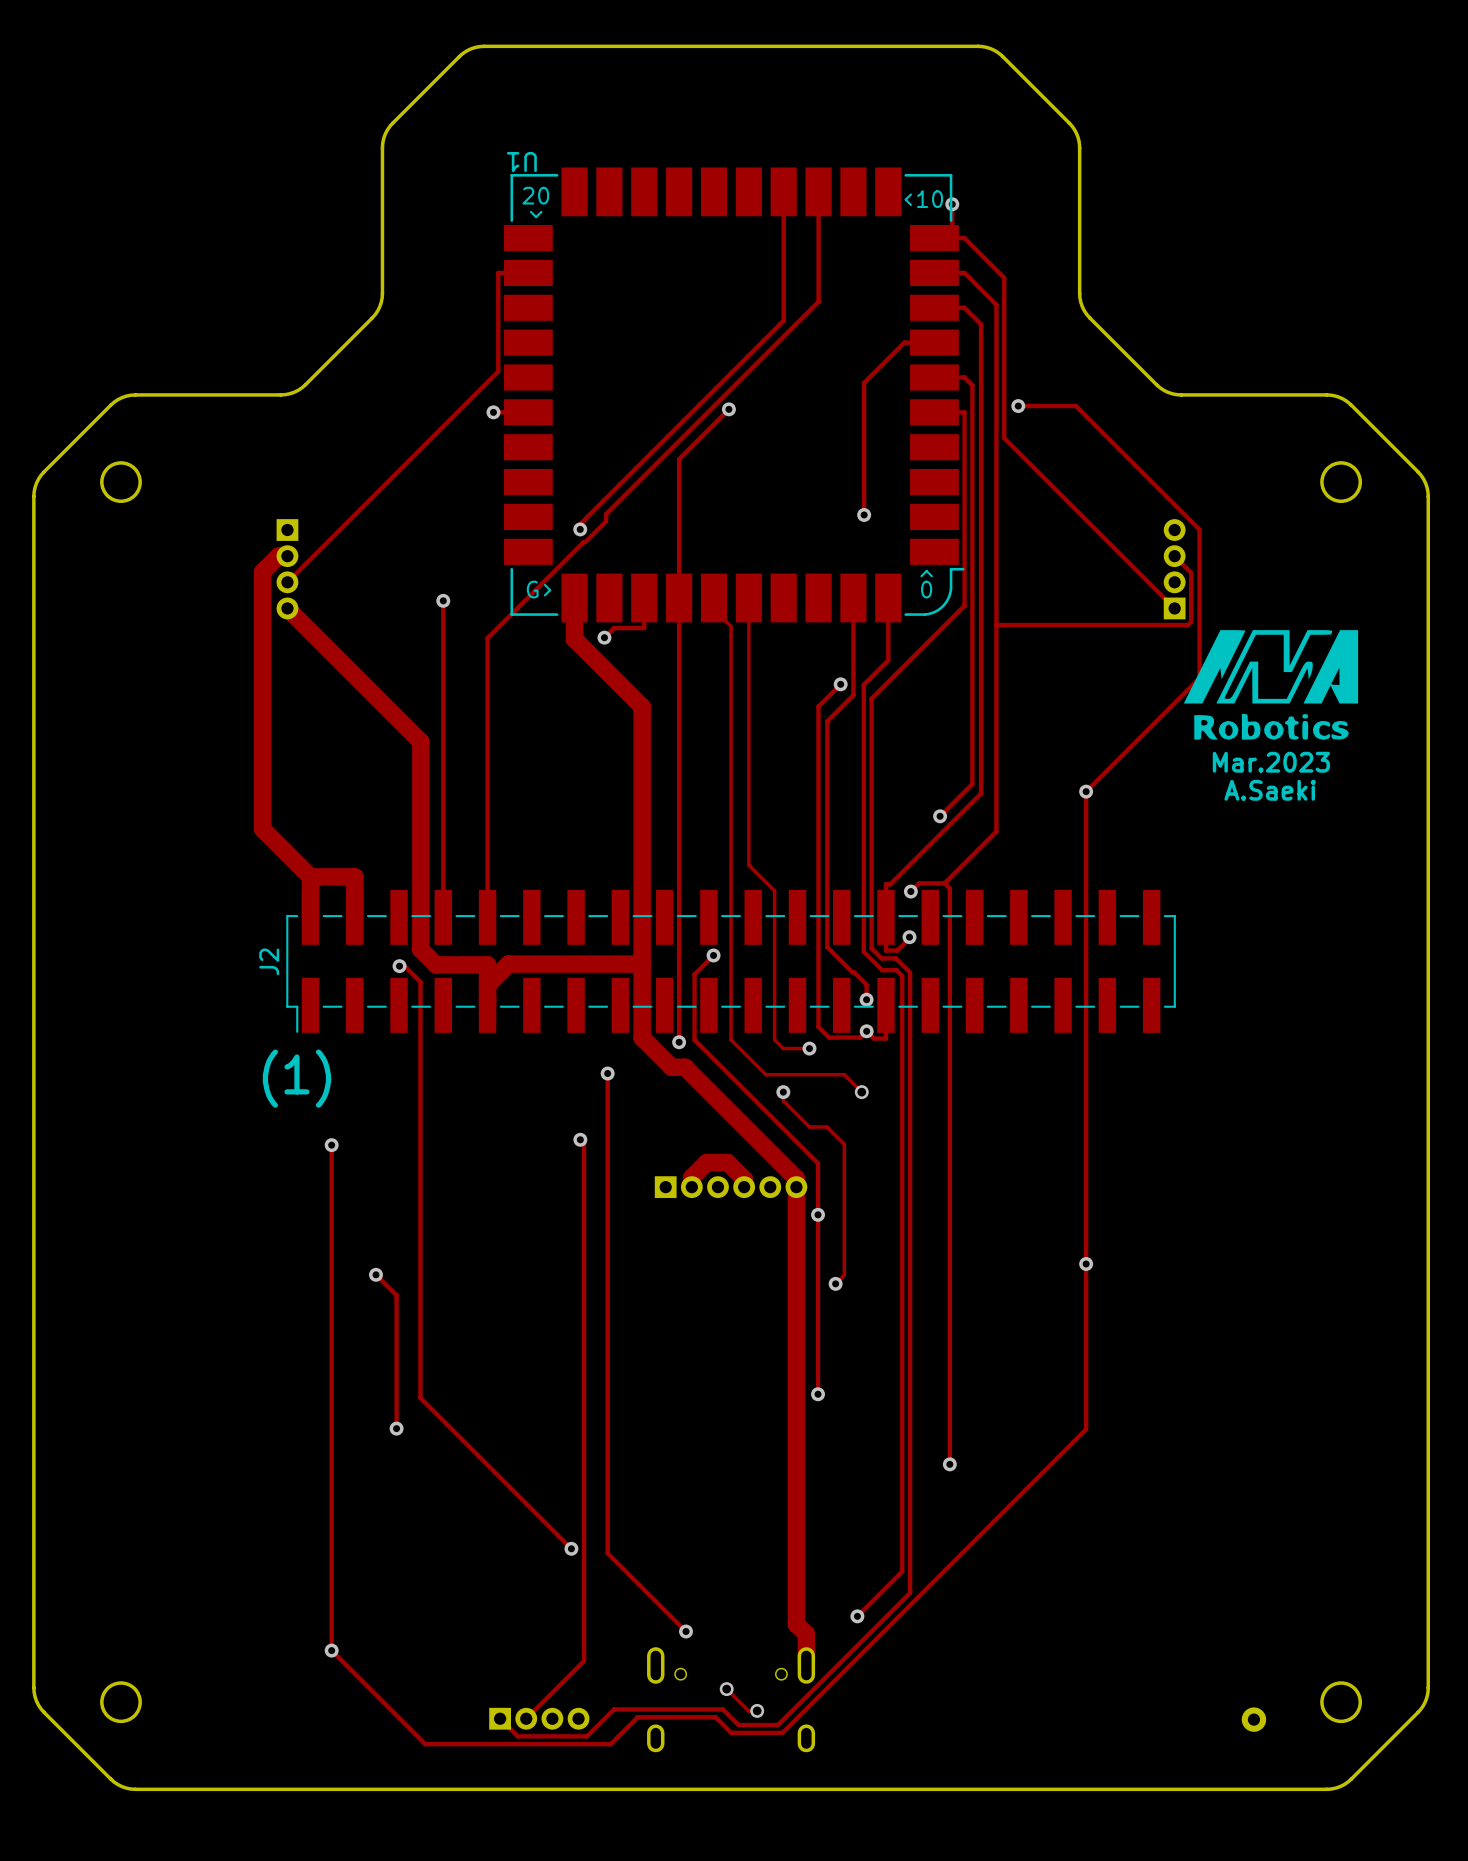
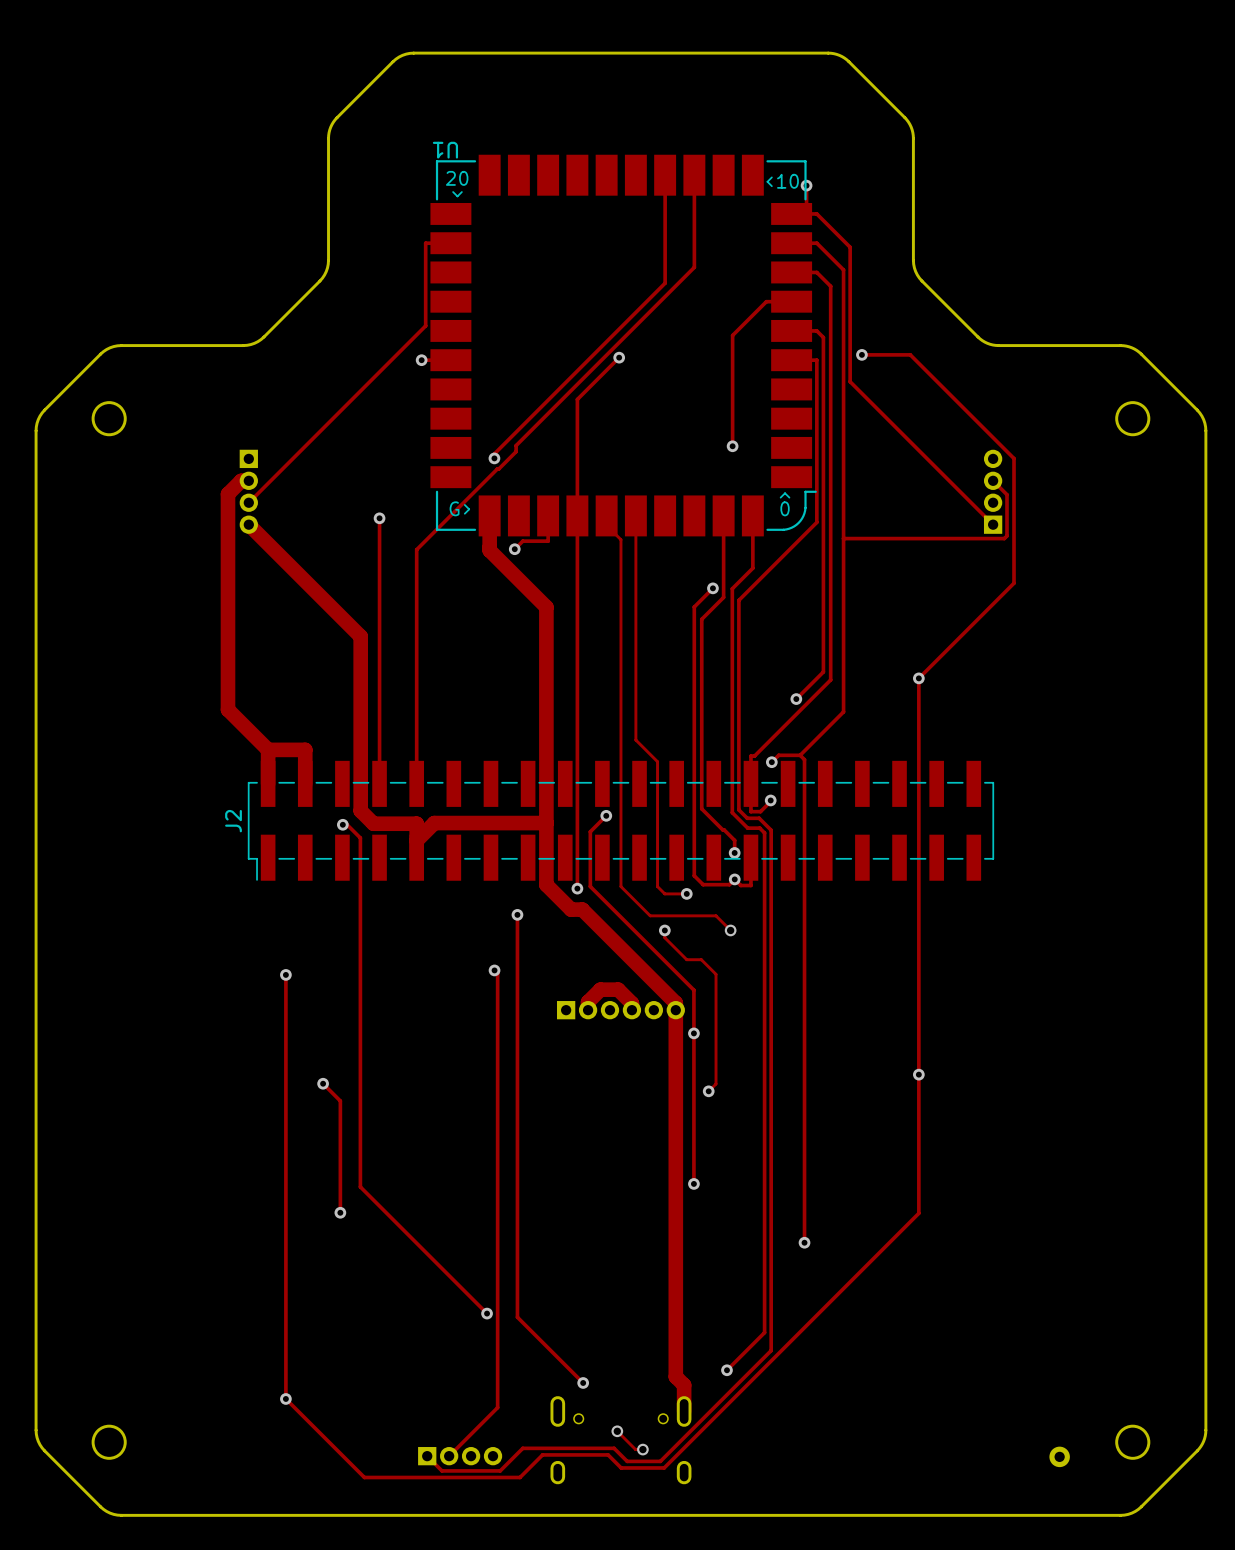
drawing: [1183, 630, 1359, 740] -> none
text: Mar.2023 (1271, 762) -> none
text: A.Saeki (1270, 790) -> none
text: (1) (296, 1078) -> none

